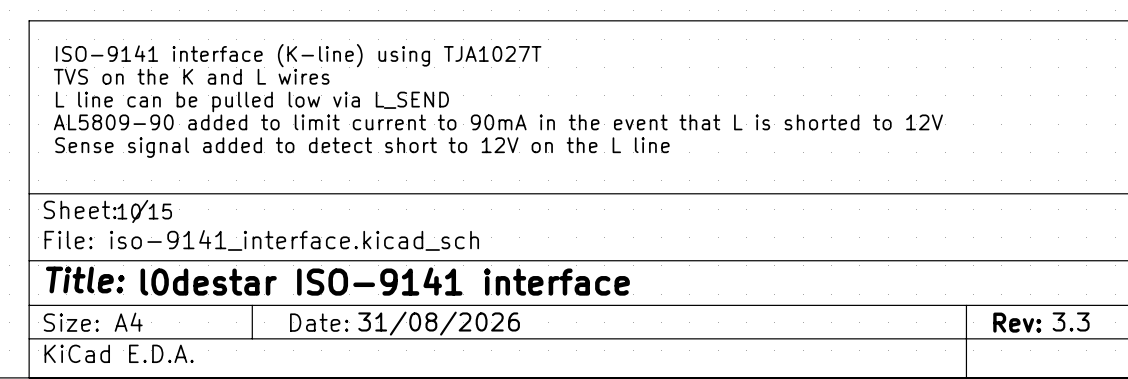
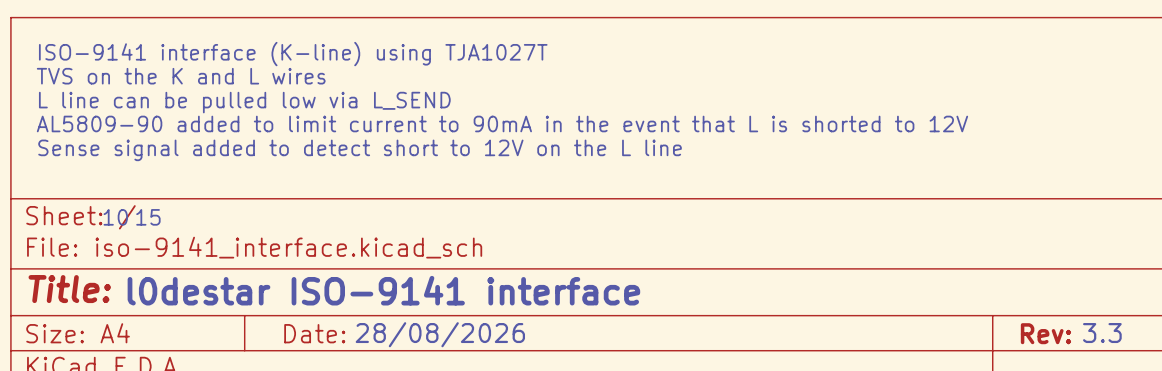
text: 31/08/2026 (439, 323) -> 28/08/2026 (440, 334)

